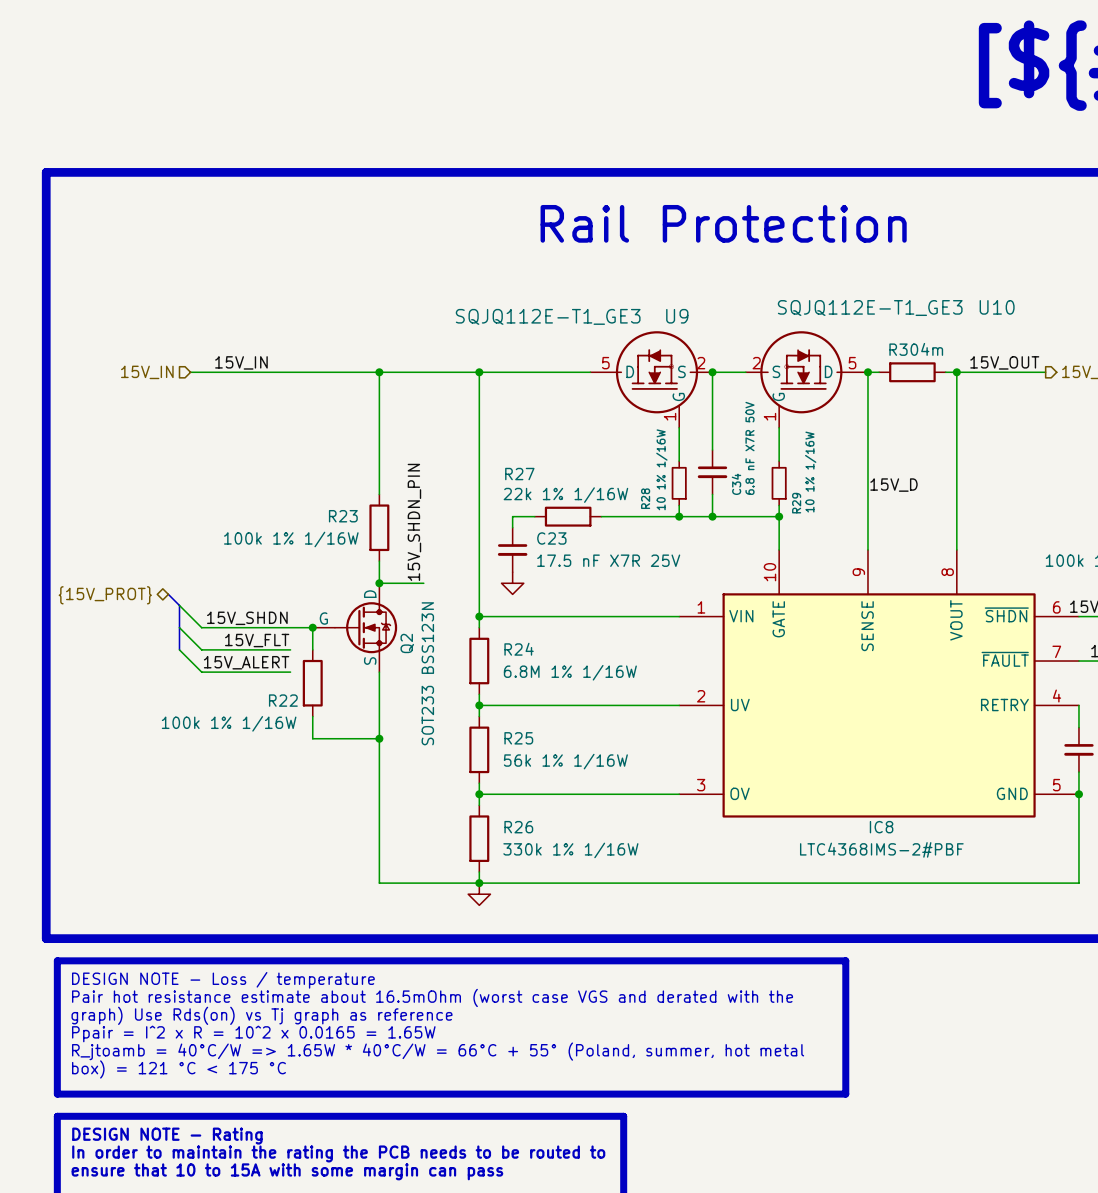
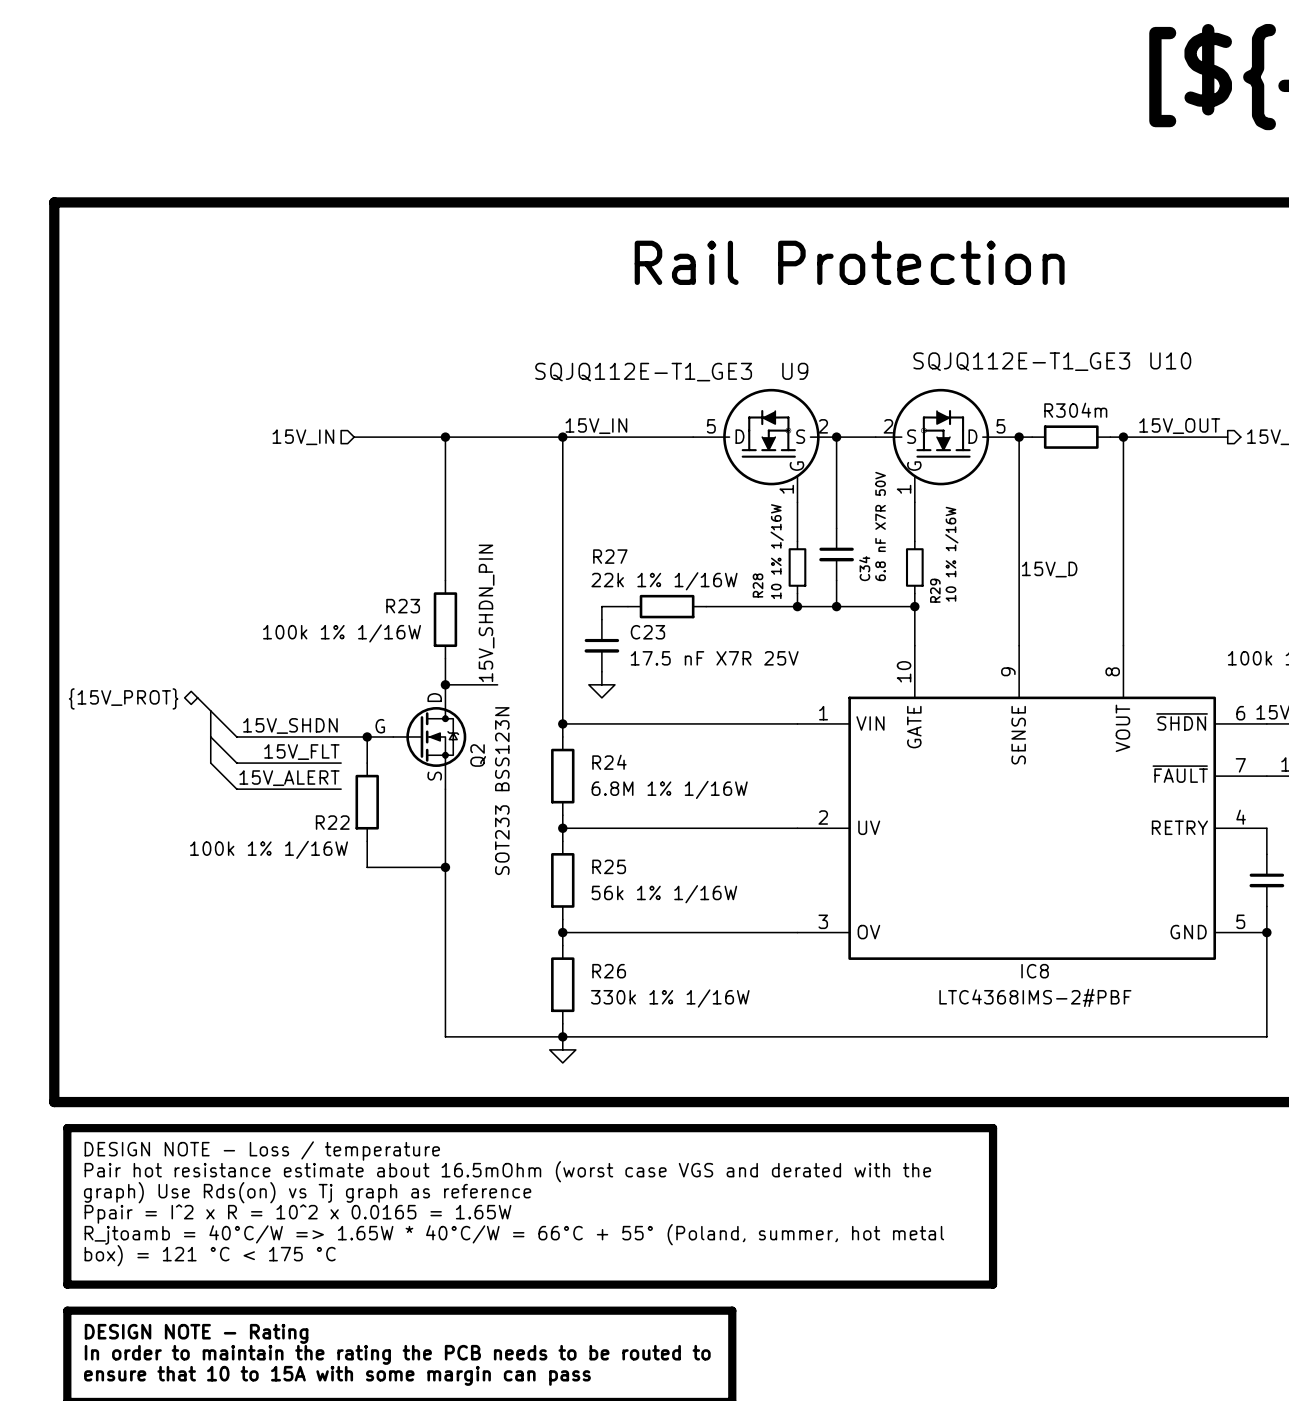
label: 15V_IN (241, 362) -> none
label: none -> 15V_IN (596, 426)
hierarchical label position: 15V_IN (147, 372) -> 15V_IN (303, 437)
wire: (190, 372) (301, 372) -> none

